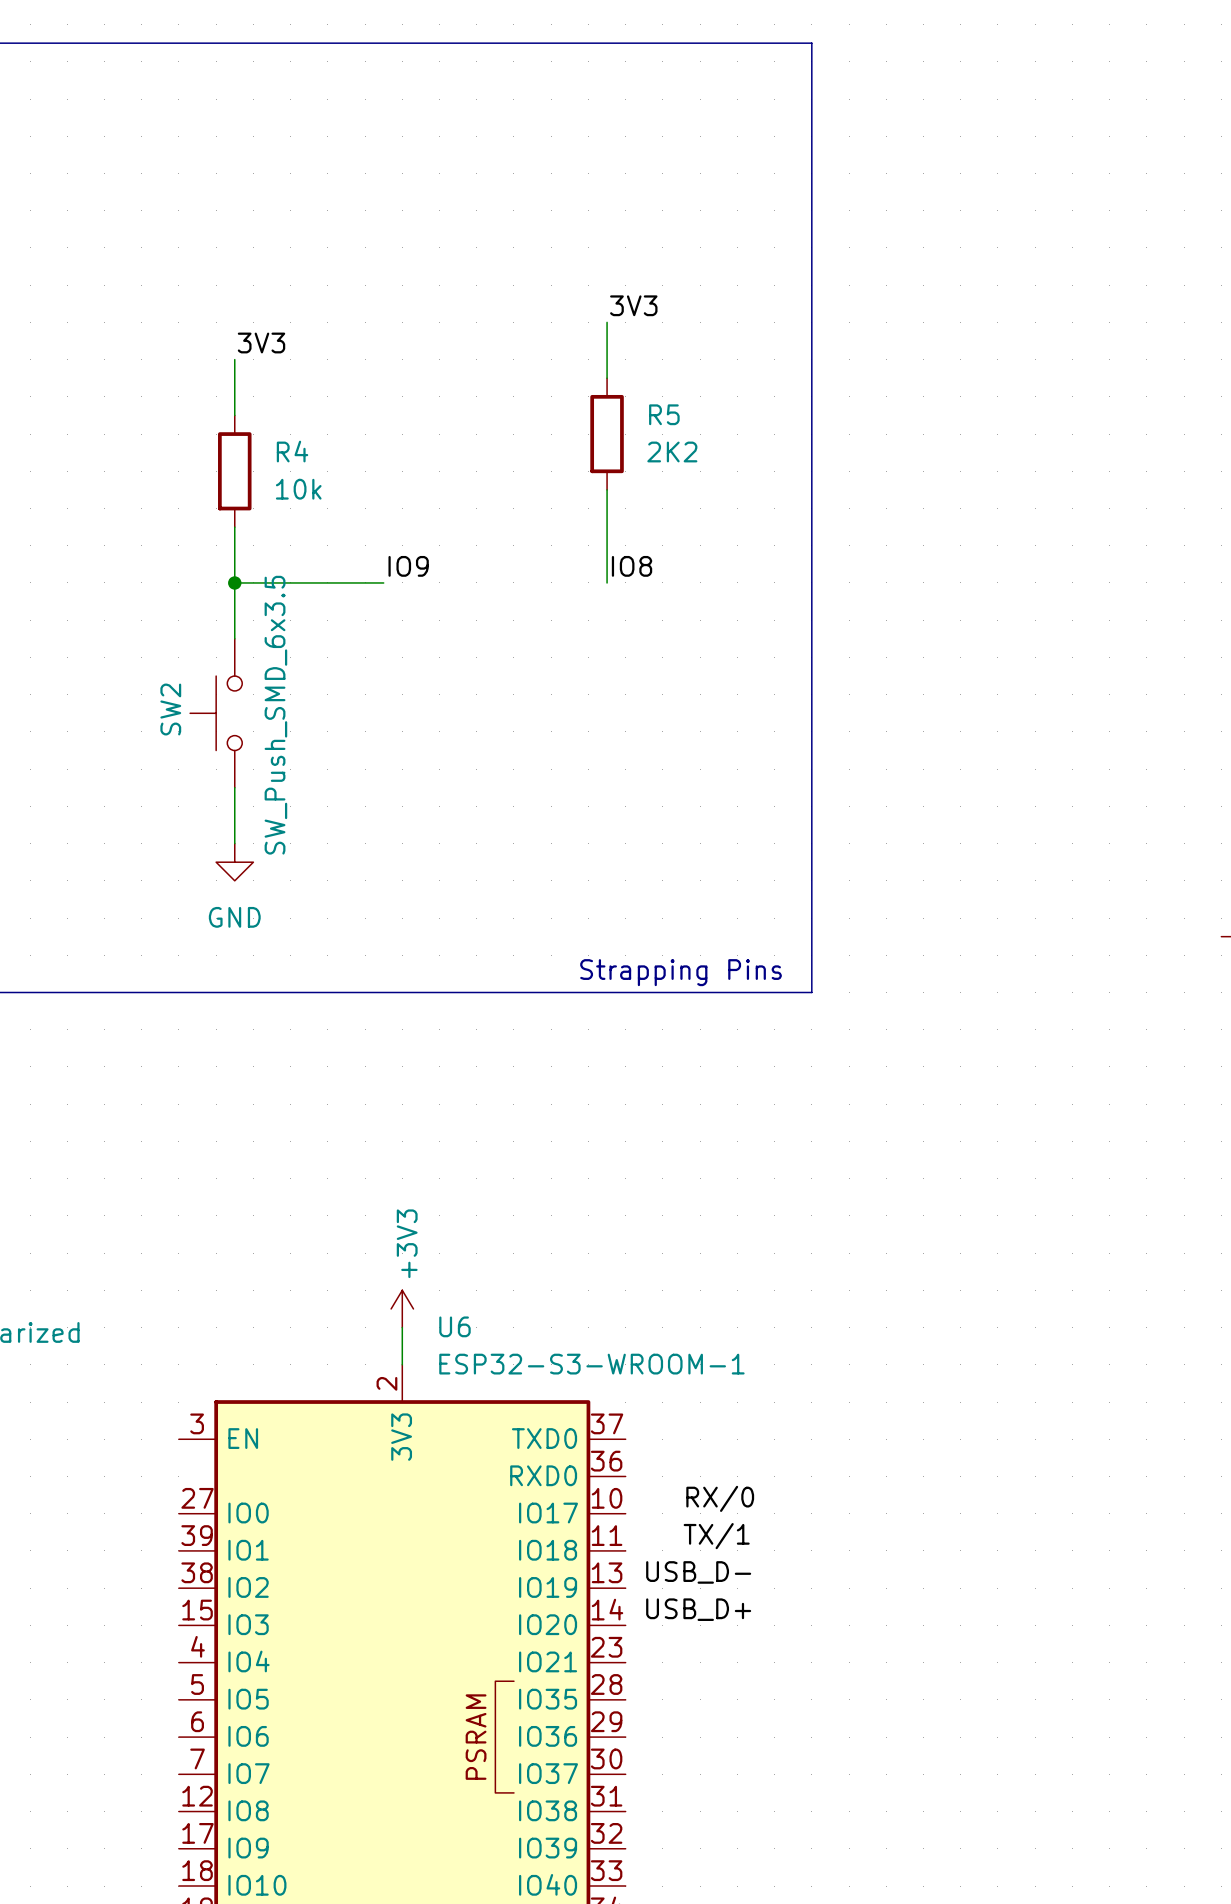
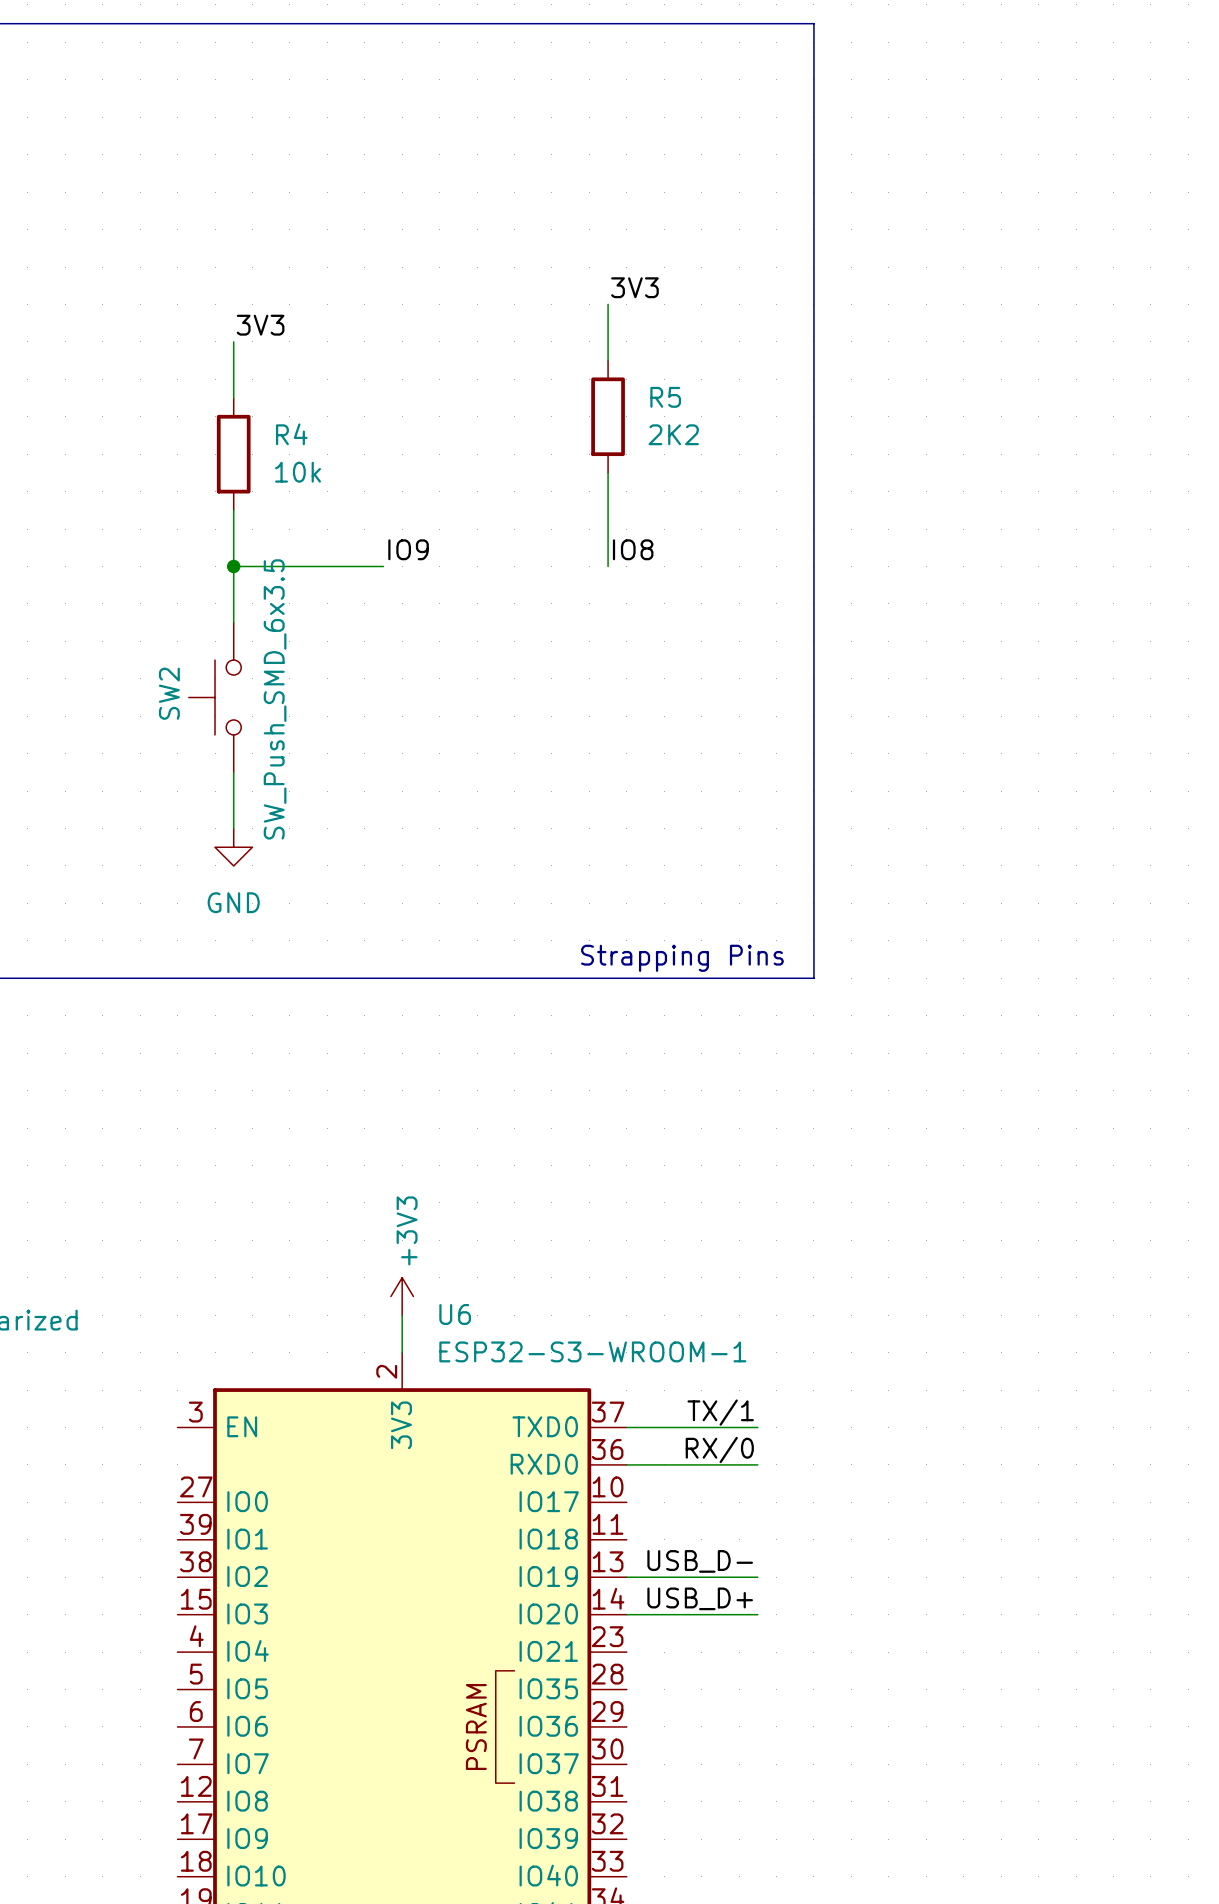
wire: none -> (626, 1427) (757, 1427)
wire: none -> (626, 1464) (757, 1464)
label position: RX/0 (720, 1498) -> RX/0 (719, 1450)
label position: TX/1 (716, 1536) -> TX/1 (720, 1412)
wire: none -> (626, 1577) (757, 1577)
wire: none -> (626, 1614) (757, 1614)

